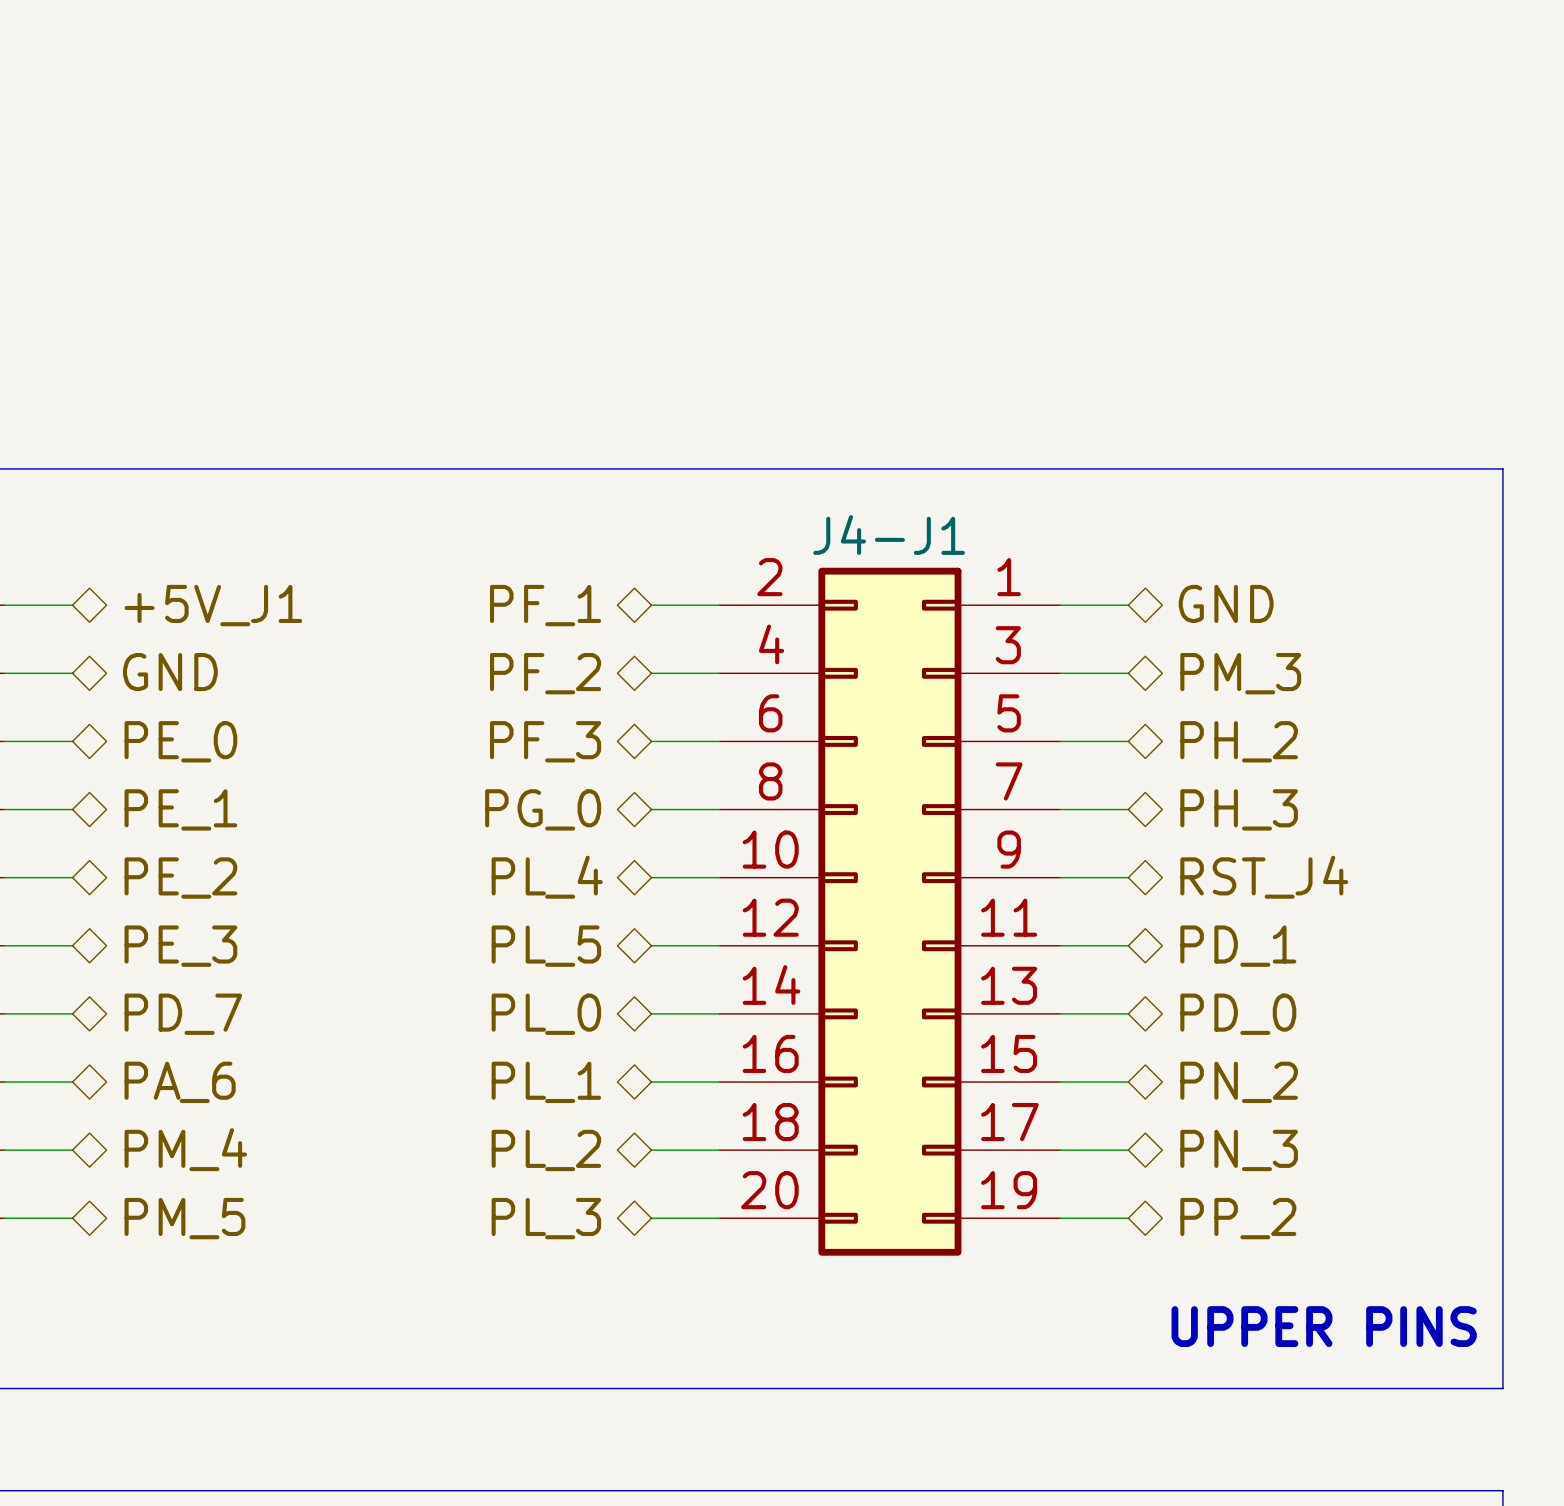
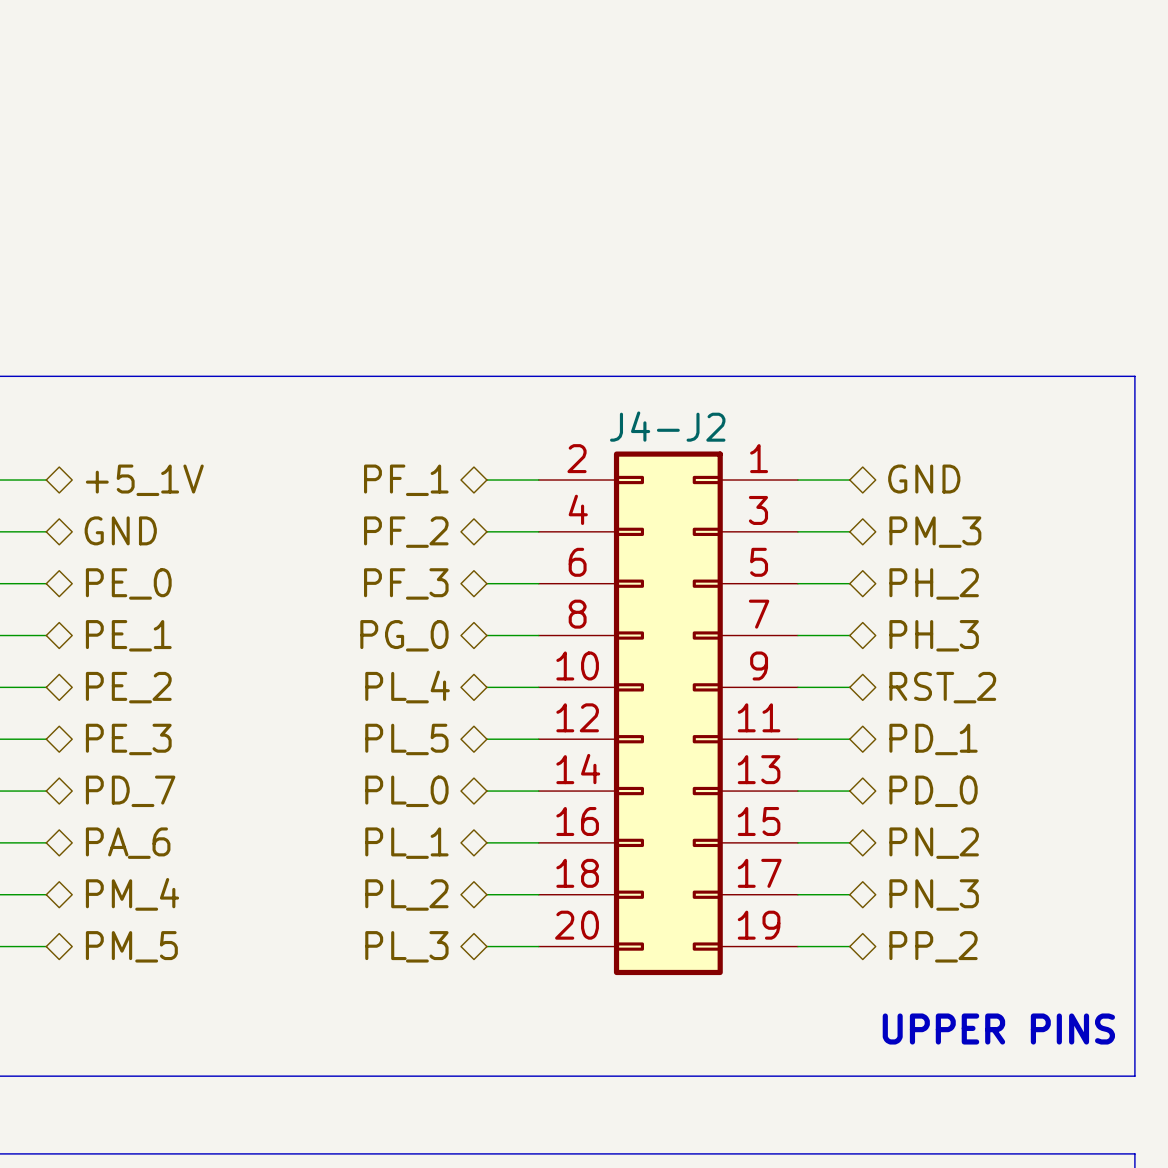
J4-J1 name: J4-J1 (889, 535) -> J4-J2 (667, 426)
hierarchical label: +5V_J1 (213, 605) -> +5_1V (144, 480)
hierarchical label: RST_J4 (1264, 877) -> RST_2 (942, 687)

